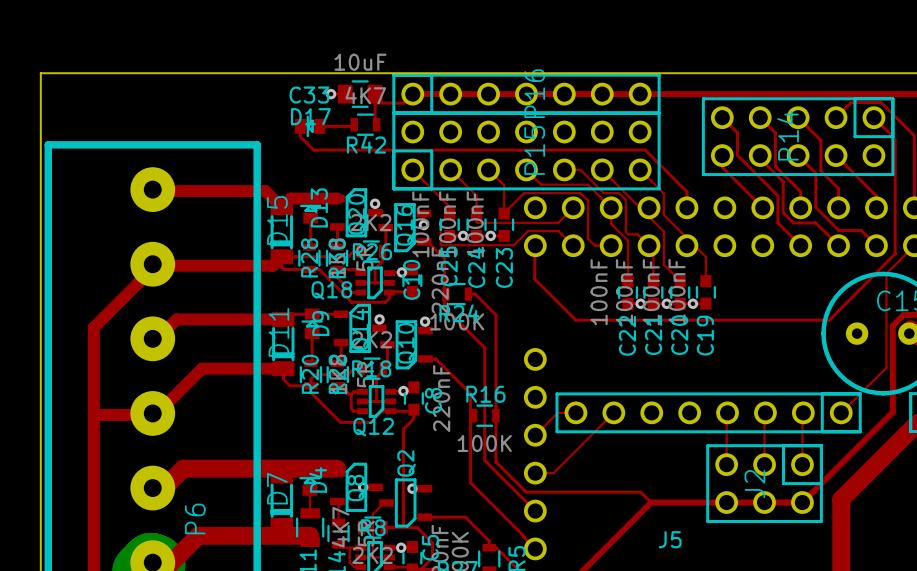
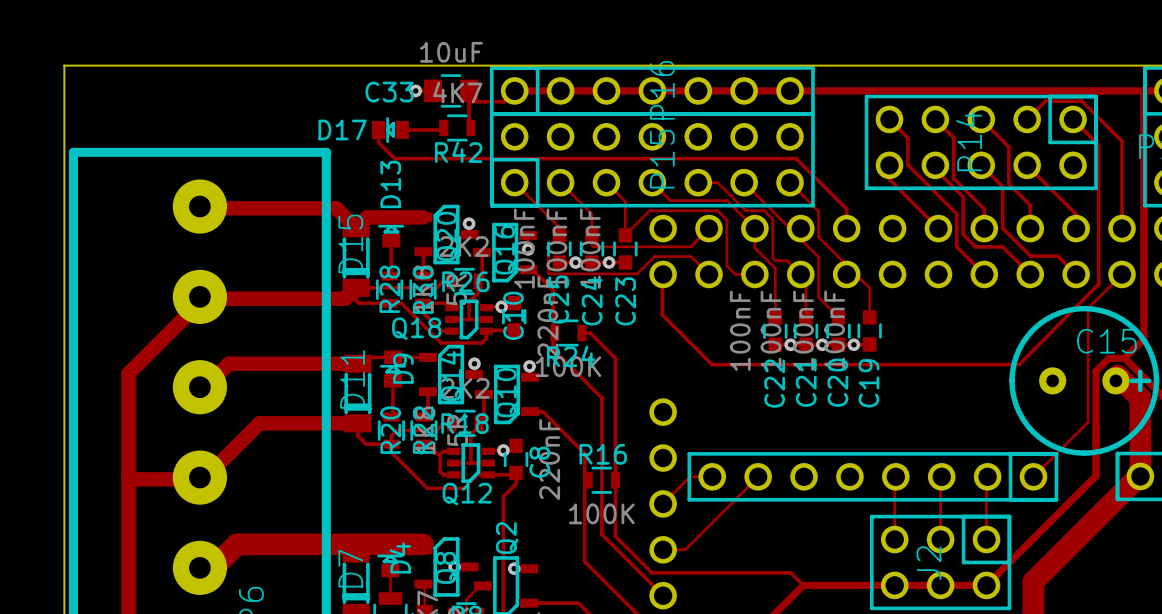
D17 name position: D17 (310, 116) -> D17 (342, 129)
D13 name position: D13 (319, 207) -> D13 (390, 184)

